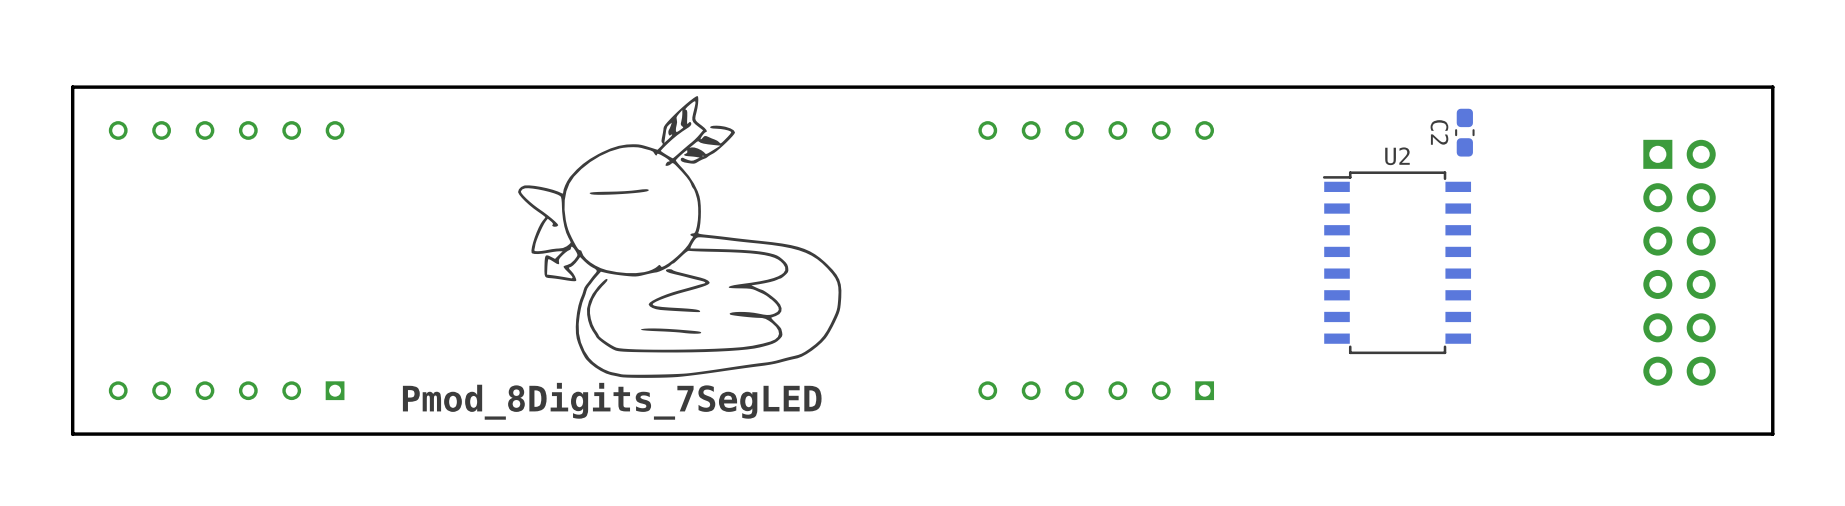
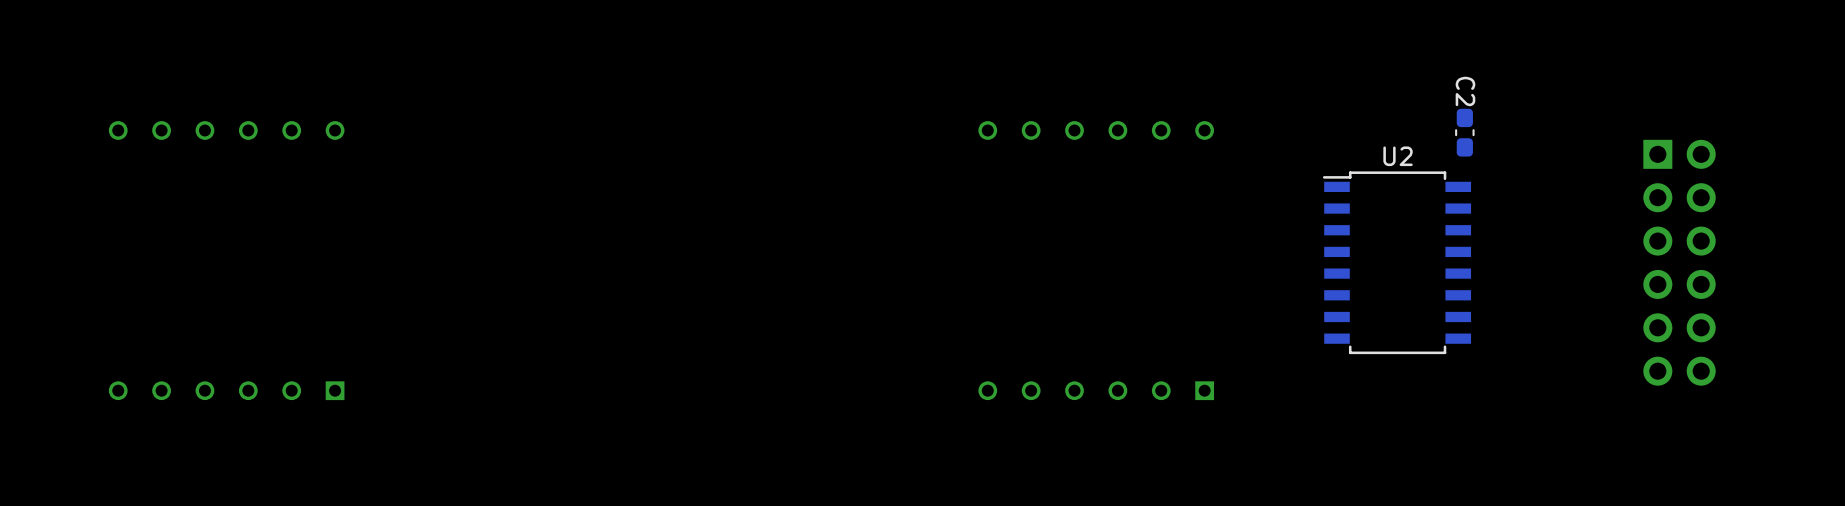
board edge: (1772, 87) (72, 87) (72, 434) (1772, 434) (1772, 87) -> none
drawing: [518, 95, 842, 378] -> none
C2 name position: C2 (1439, 132) -> C2 (1465, 91)
text: Pmod_8Digits_7SegLED (612, 401) -> none

